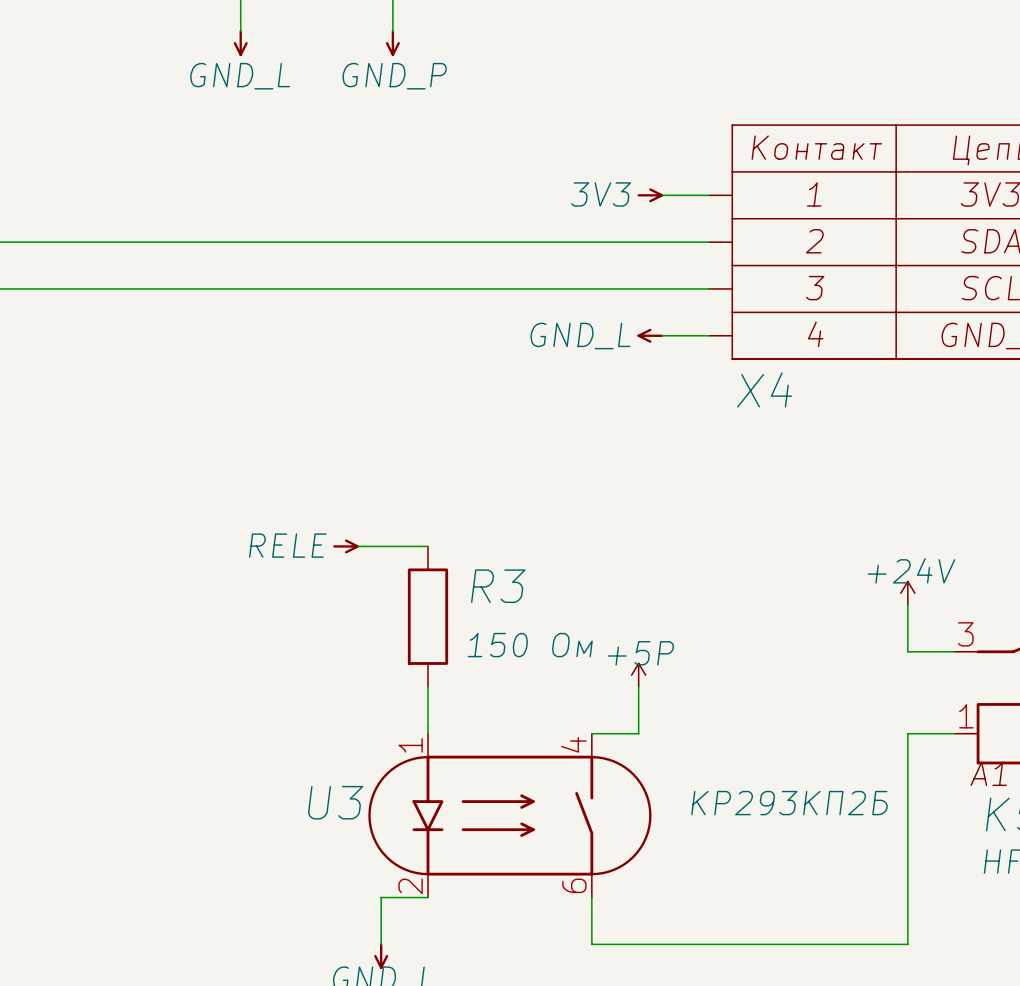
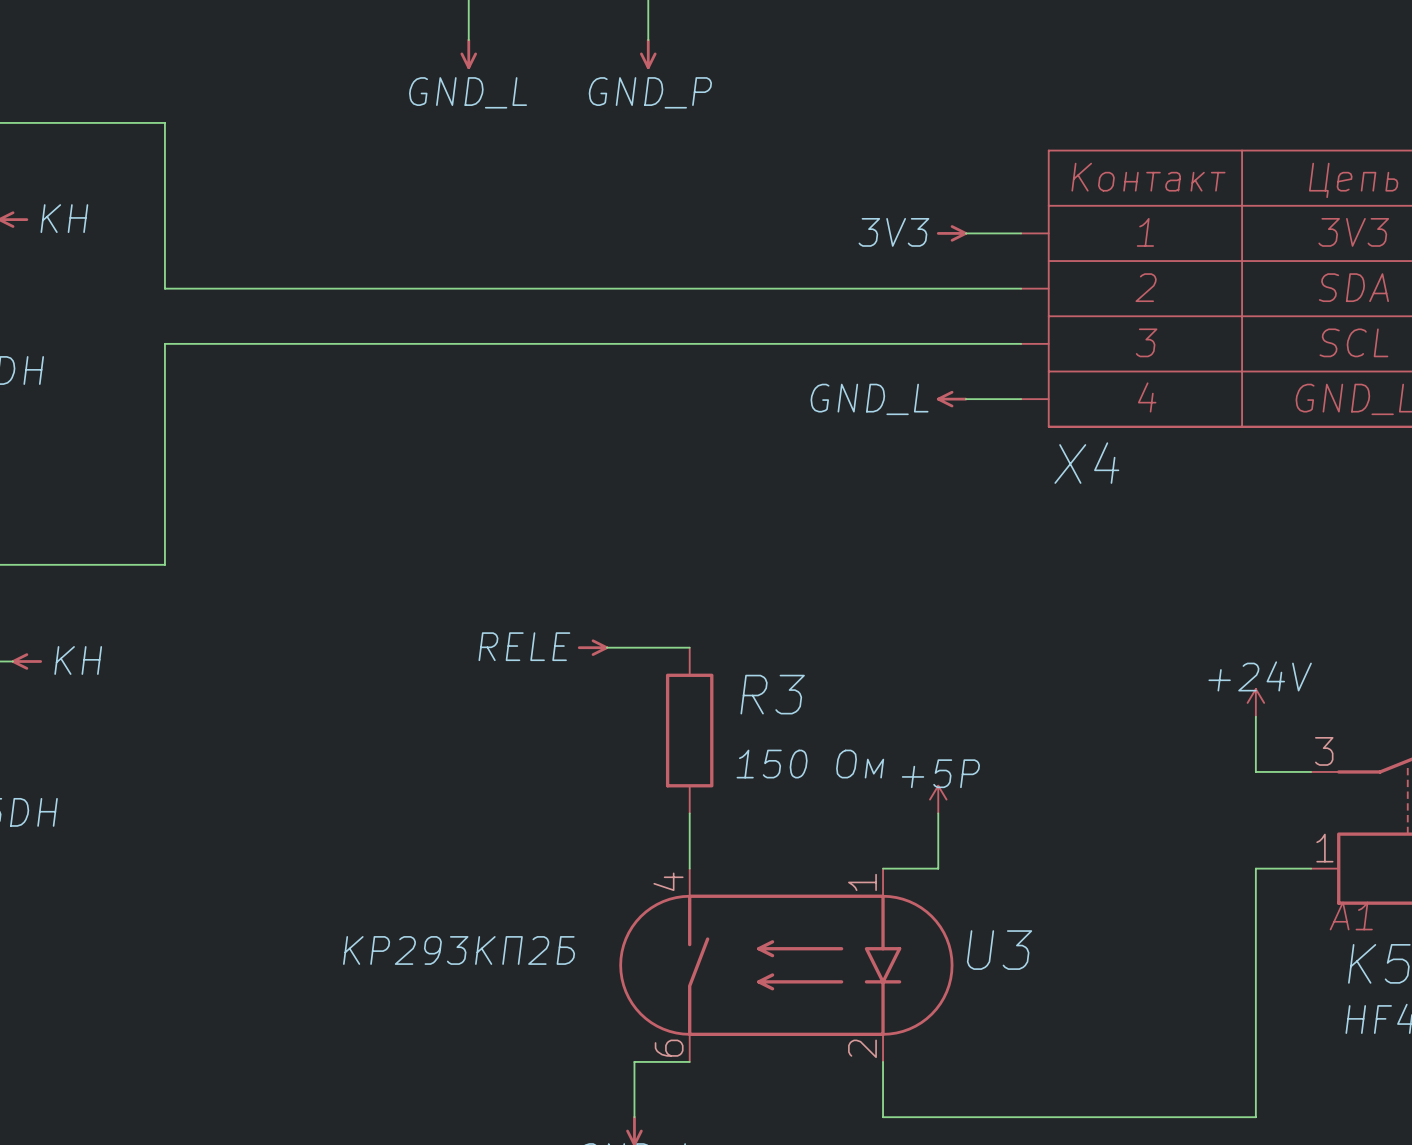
U3 flip: as is (509, 815) -> left-right (786, 965)

